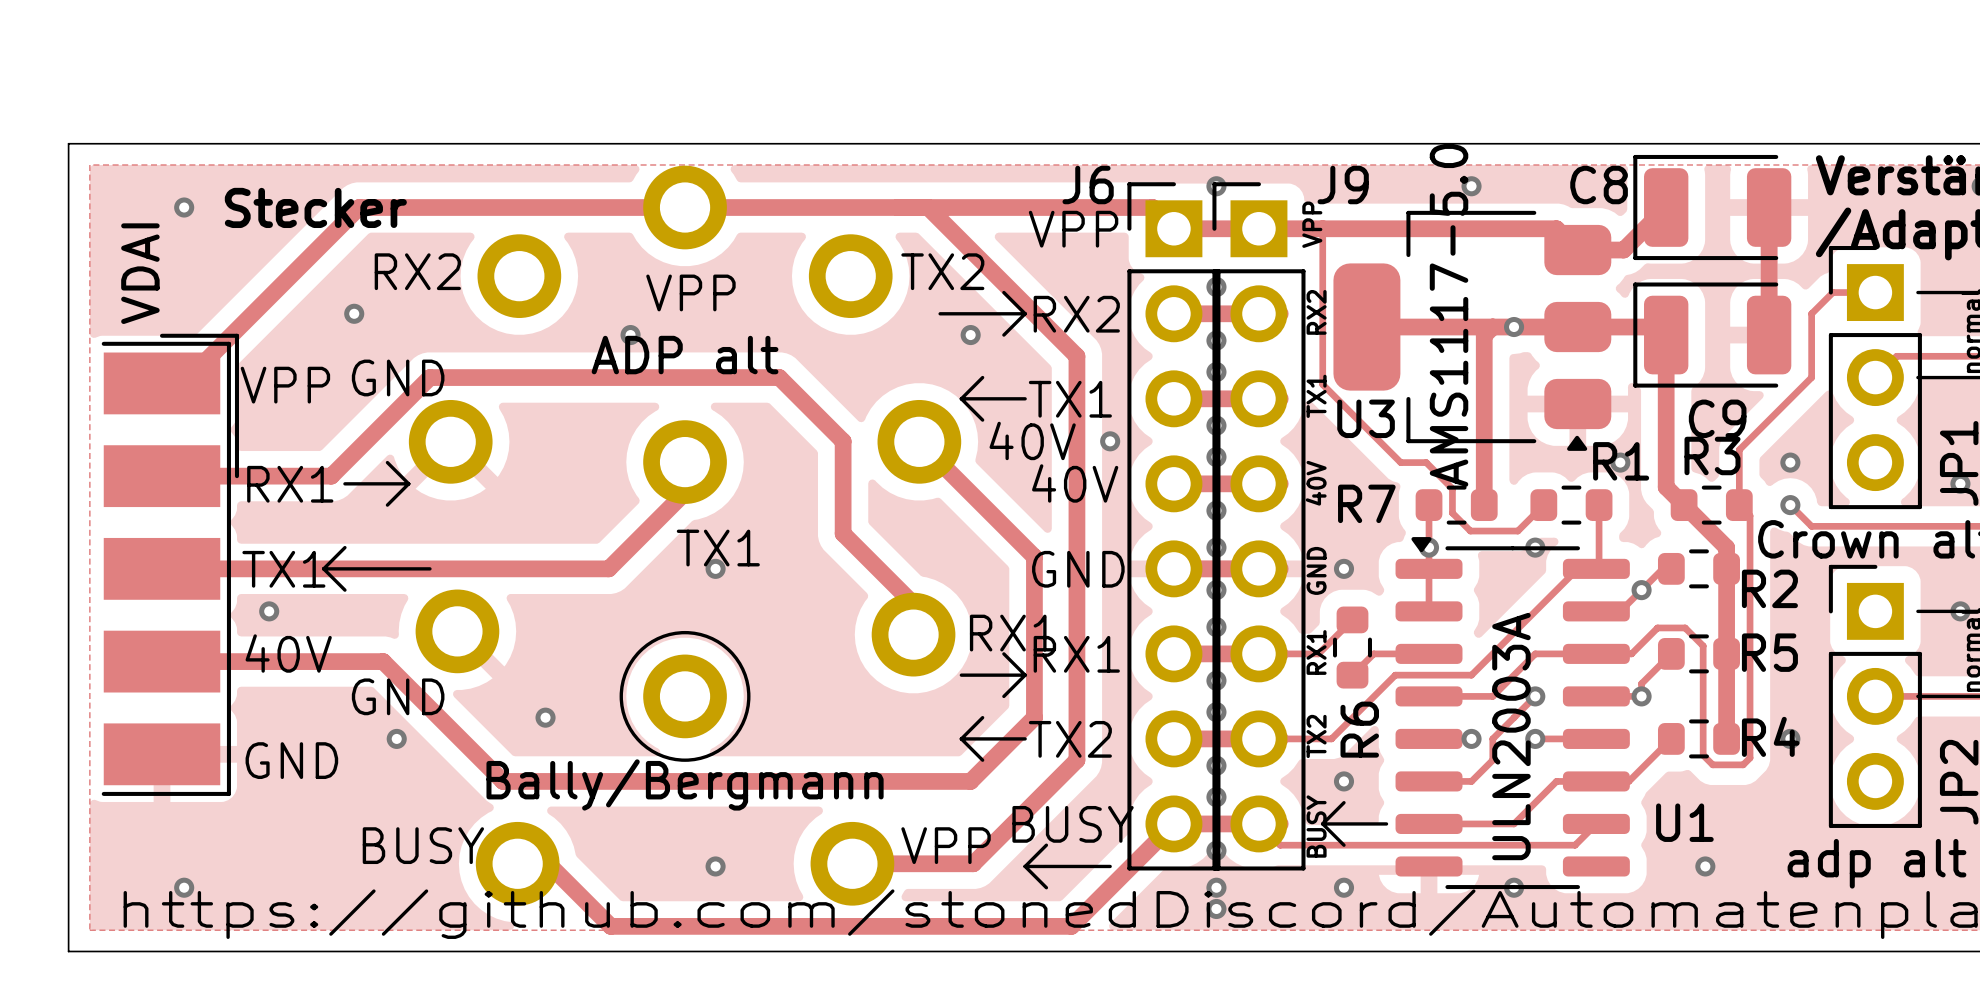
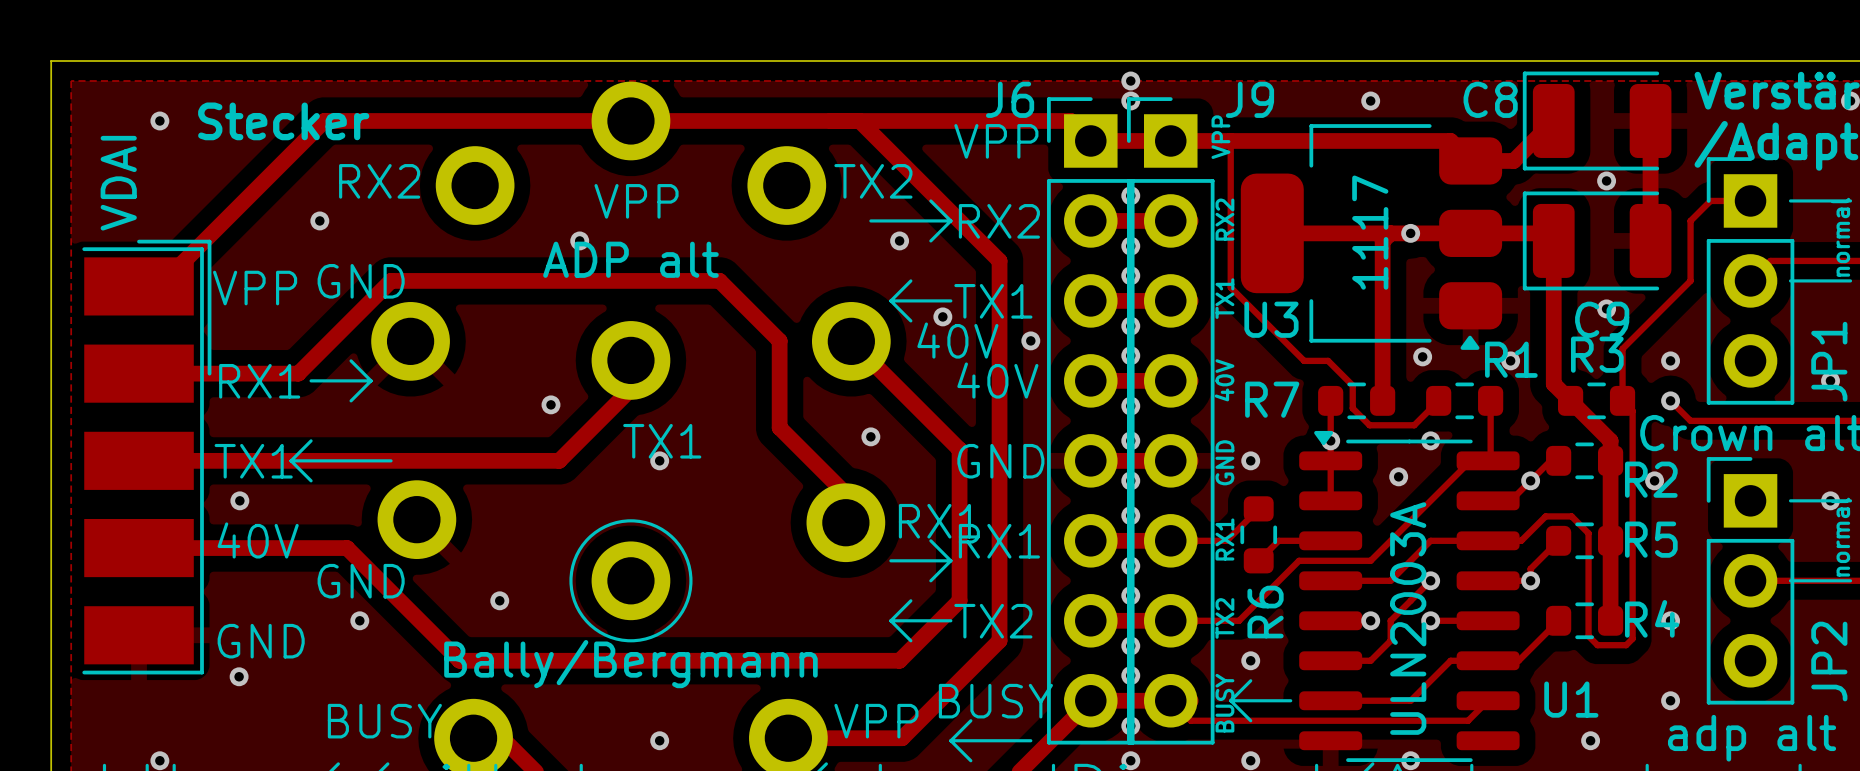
via: none -> (1130, 80)
via: none -> (1606, 180)
U3 value: AMS1117-5.0 (1449, 315) -> 1117 (1370, 232)
via: none -> (1606, 308)
via: none -> (942, 316)
via: none -> (1422, 356)
via: none -> (550, 404)
via: none -> (870, 436)
via: none -> (1398, 476)
via: none -> (1654, 480)
via: none -> (239, 676)
via: none -> (1670, 700)

